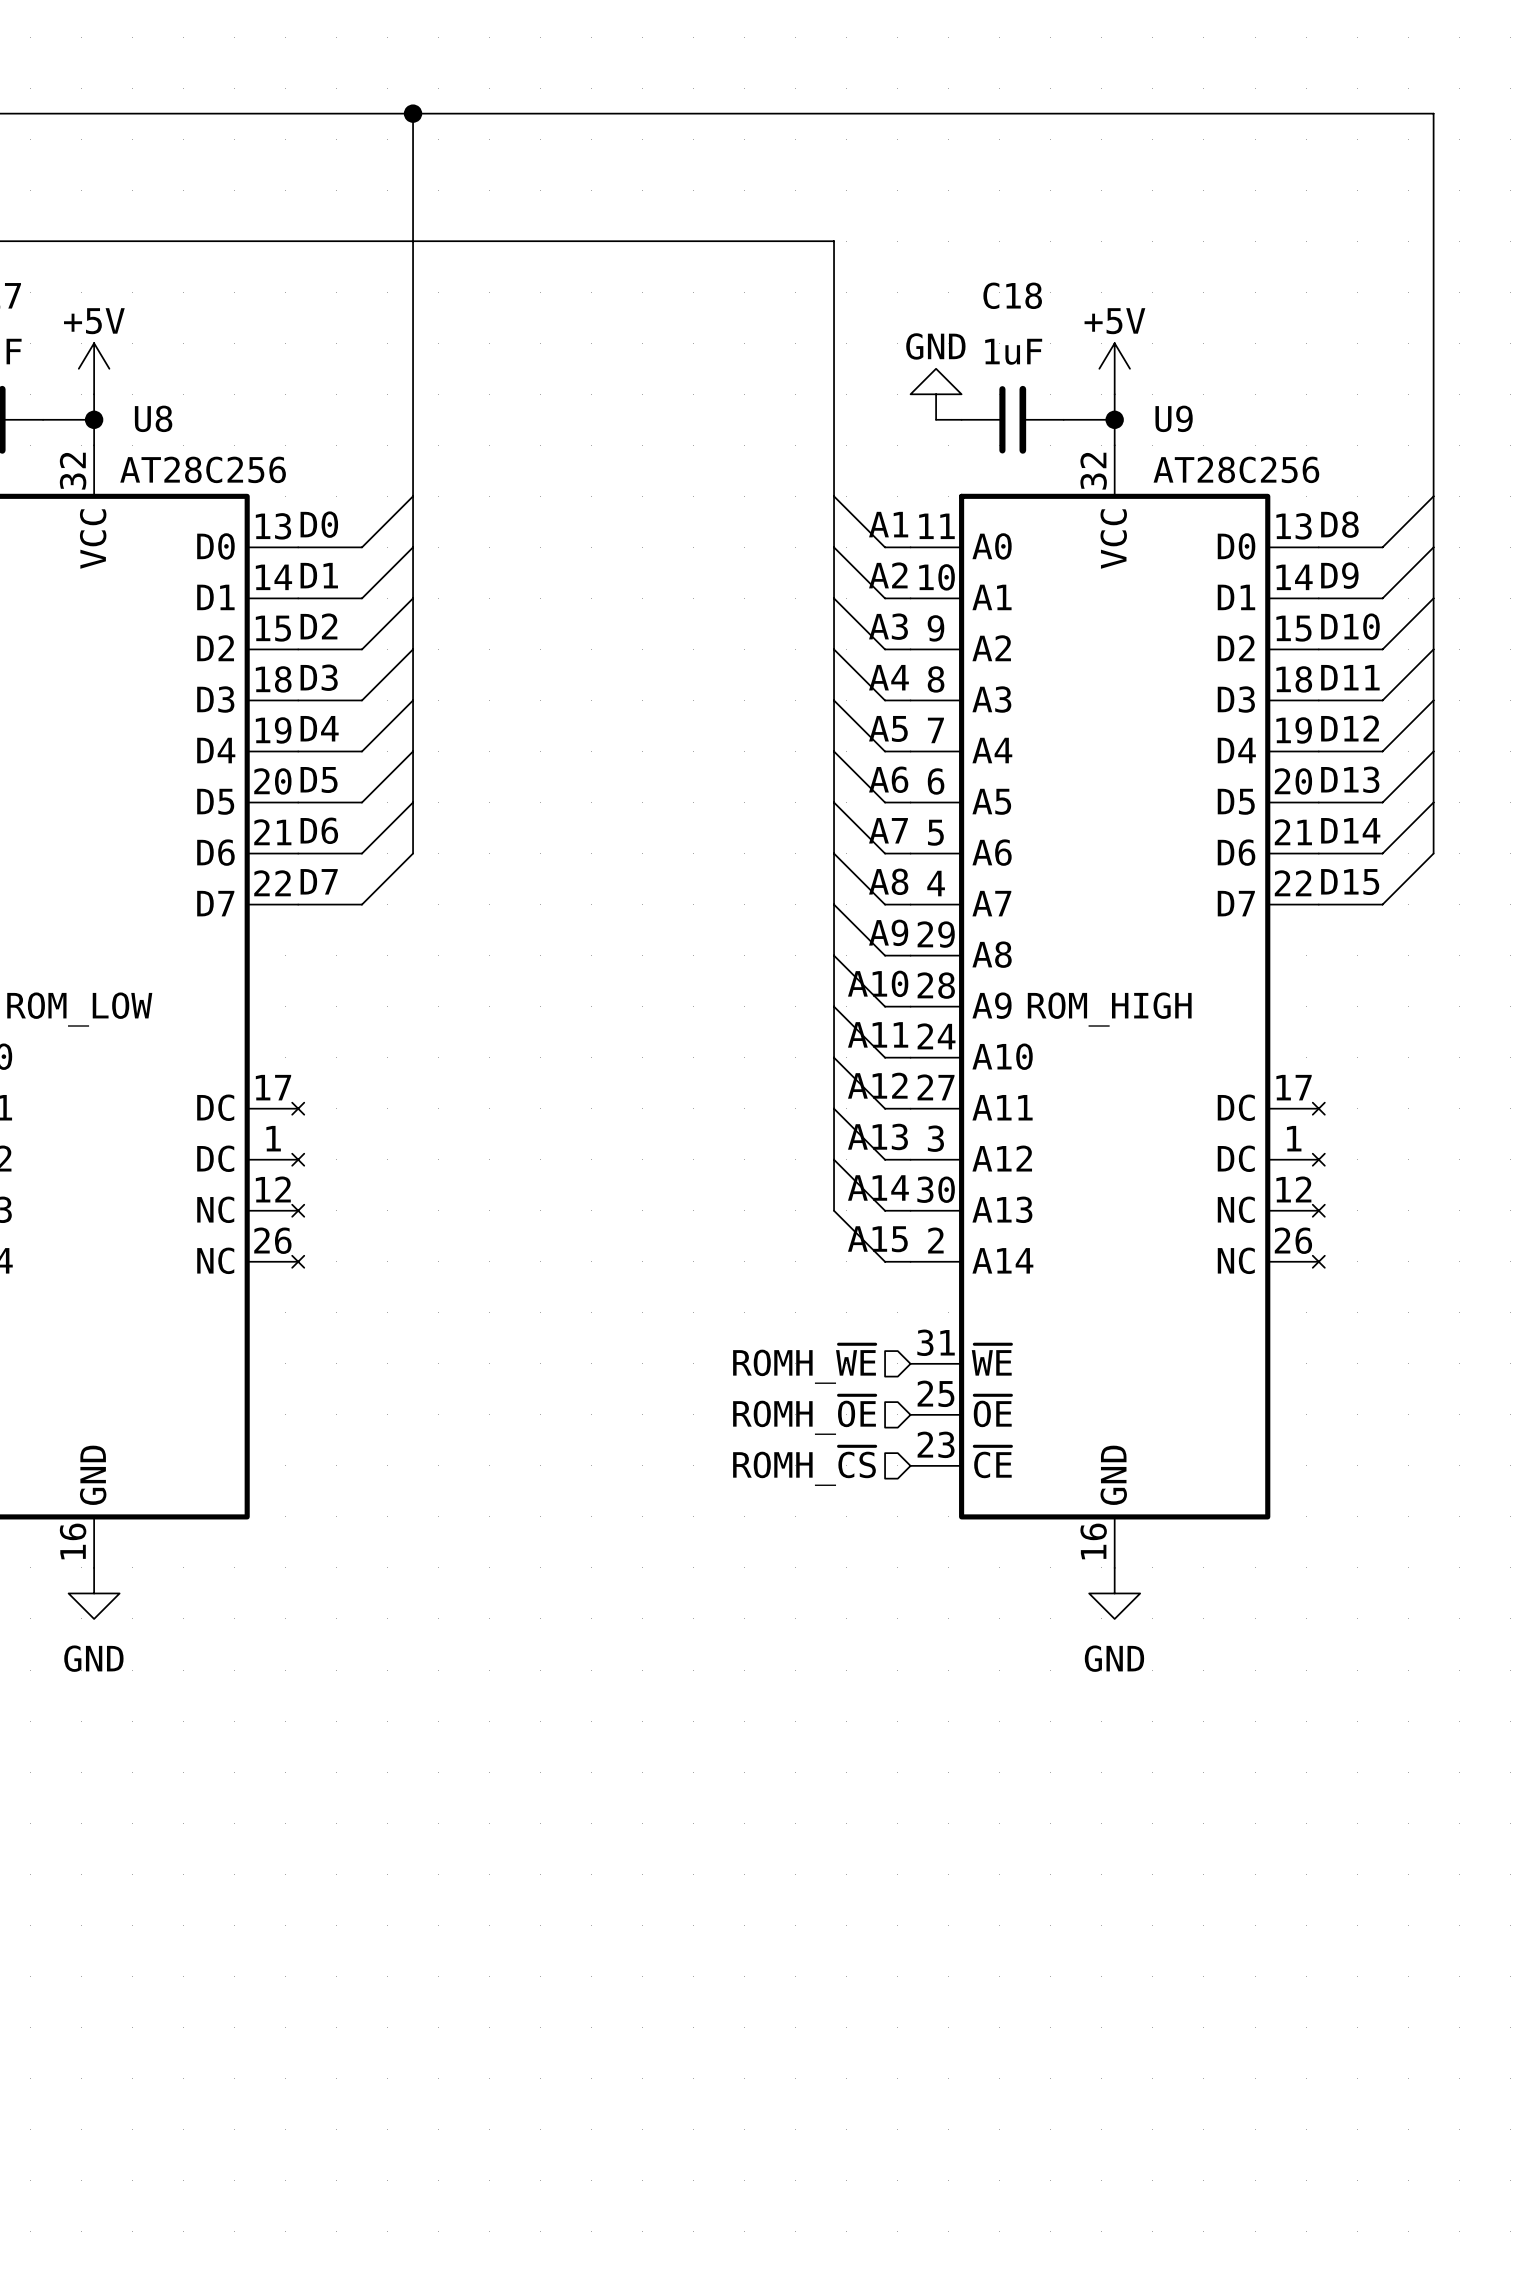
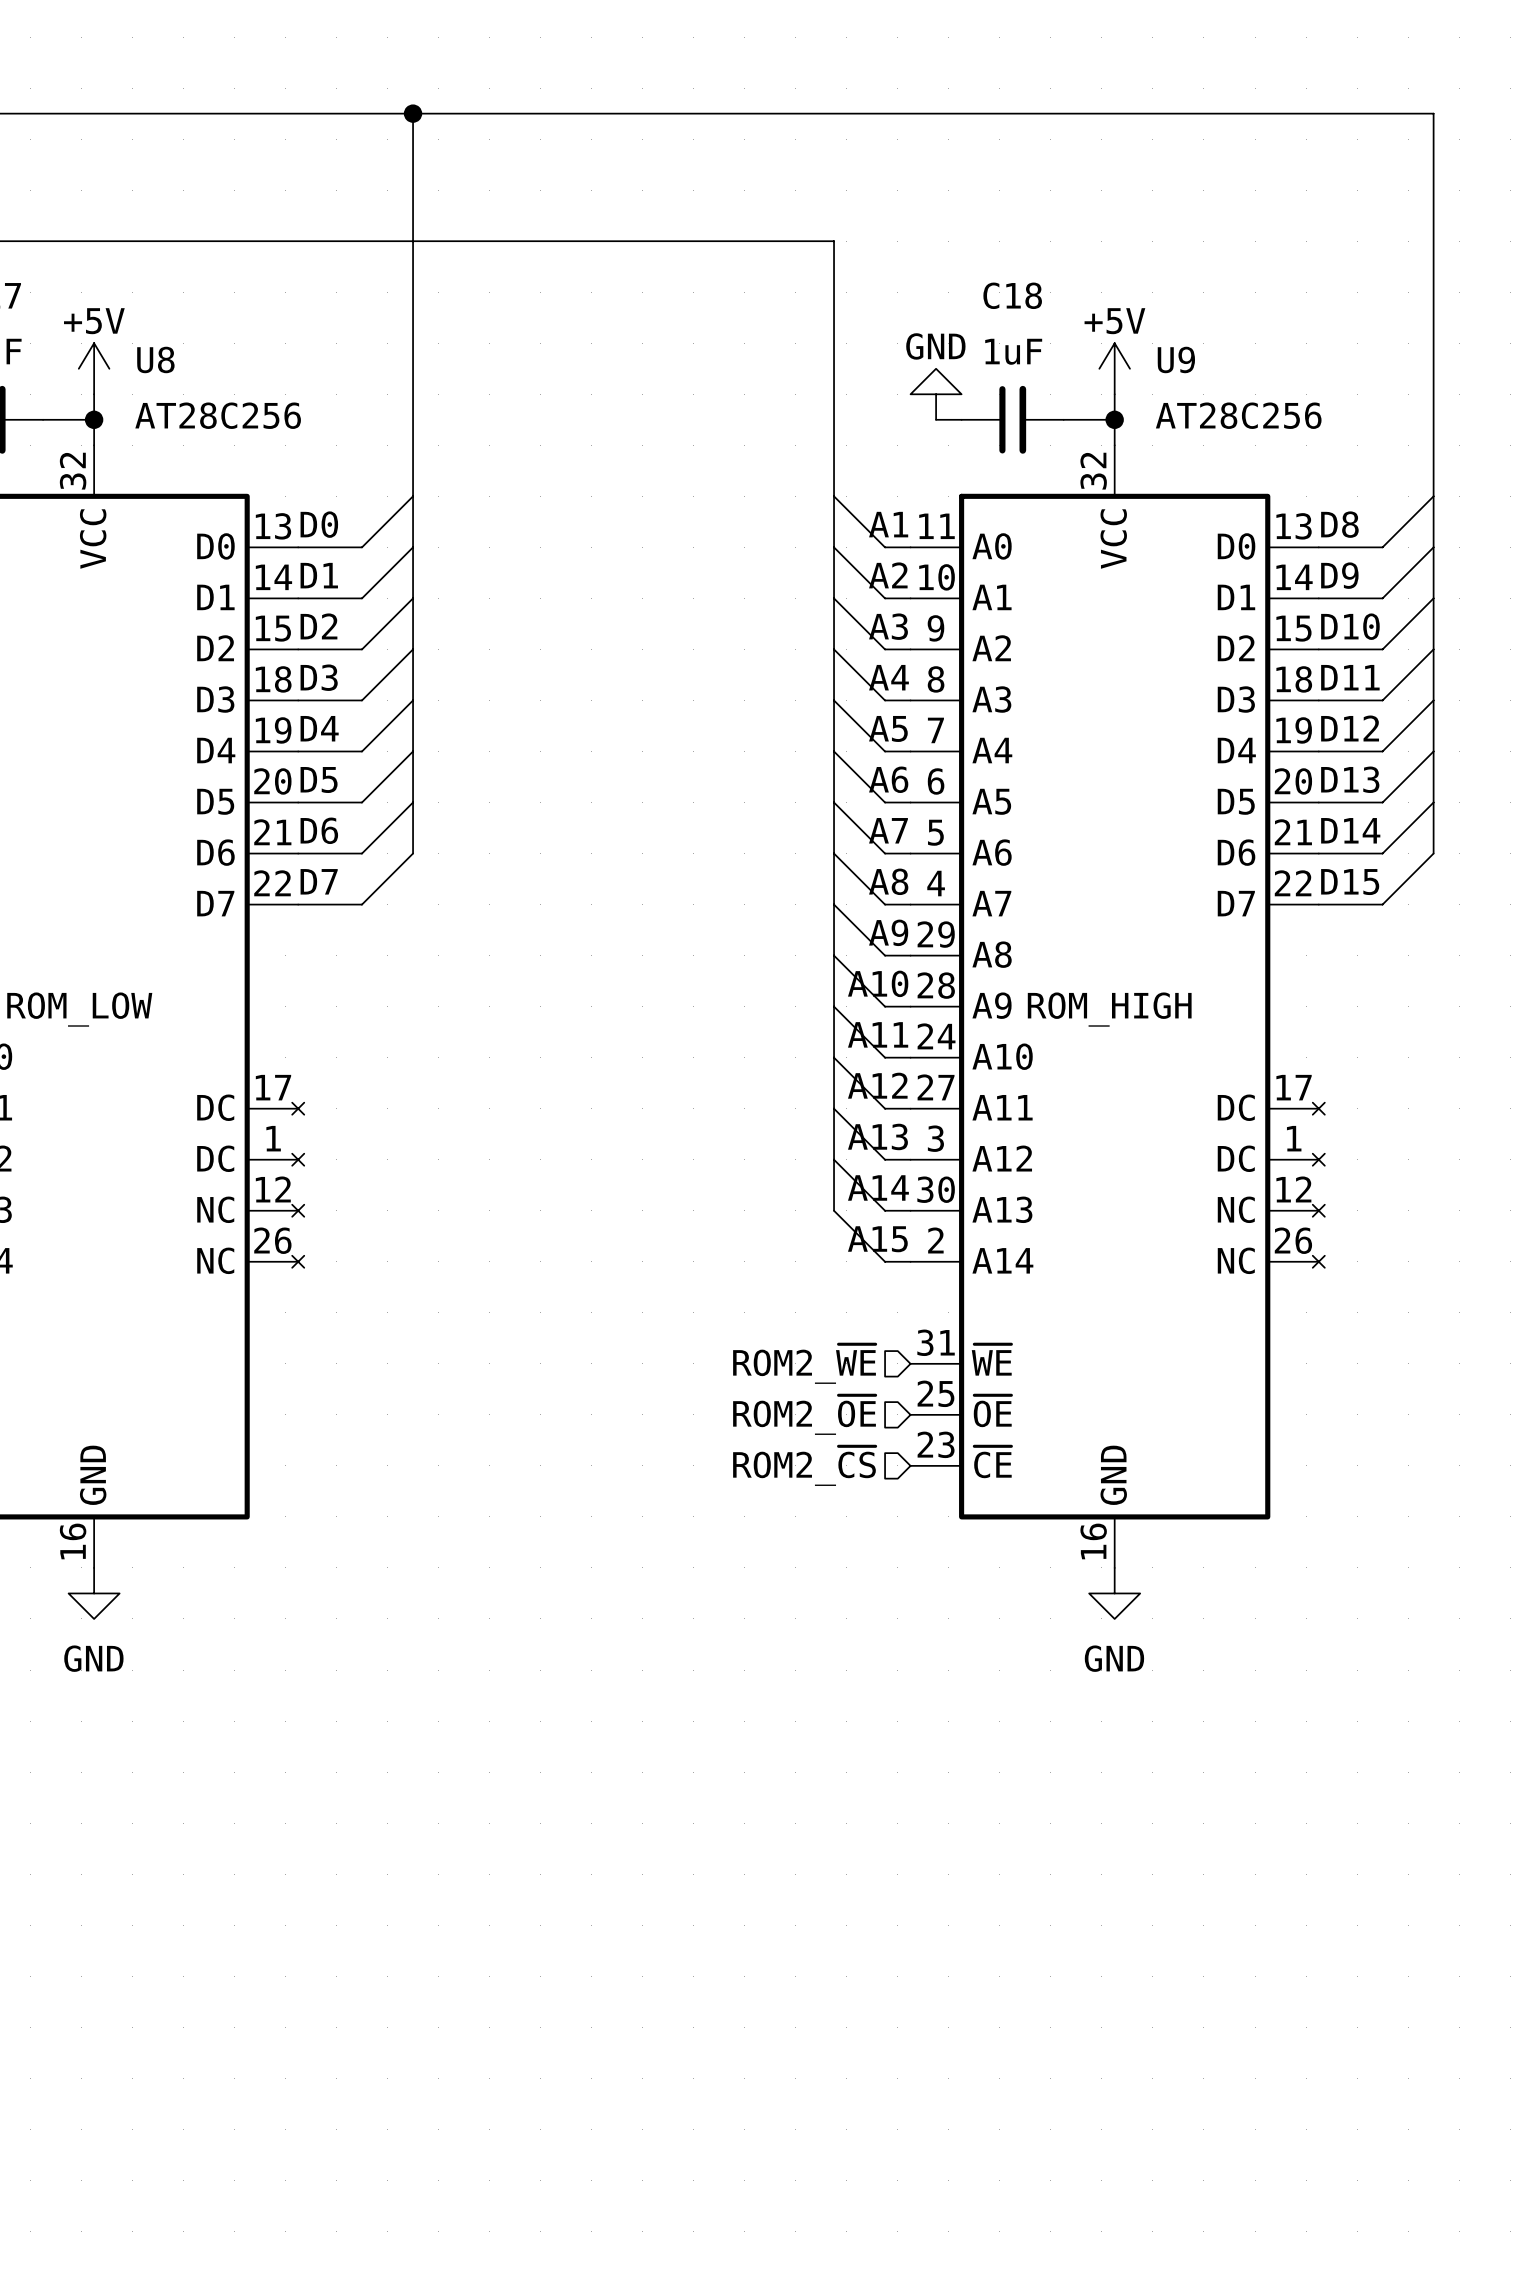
U8 name position: U8 (153, 418) -> U8 (155, 359)
U9 name position: U9 (1174, 418) -> U9 (1176, 359)
U8 value position: AT28C256 (203, 469) -> AT28C256 (218, 415)
U9 value position: AT28C256 (1236, 469) -> AT28C256 (1238, 415)
hierarchical label: ROMH_~{WE} (804, 1364) -> ROM2_~{WE} (804, 1364)
hierarchical label: ROMH_~{OE} (804, 1415) -> ROM2_~{OE} (804, 1415)
hierarchical label: ROMH_~{CS} (804, 1466) -> ROM2_~{CS} (804, 1466)

